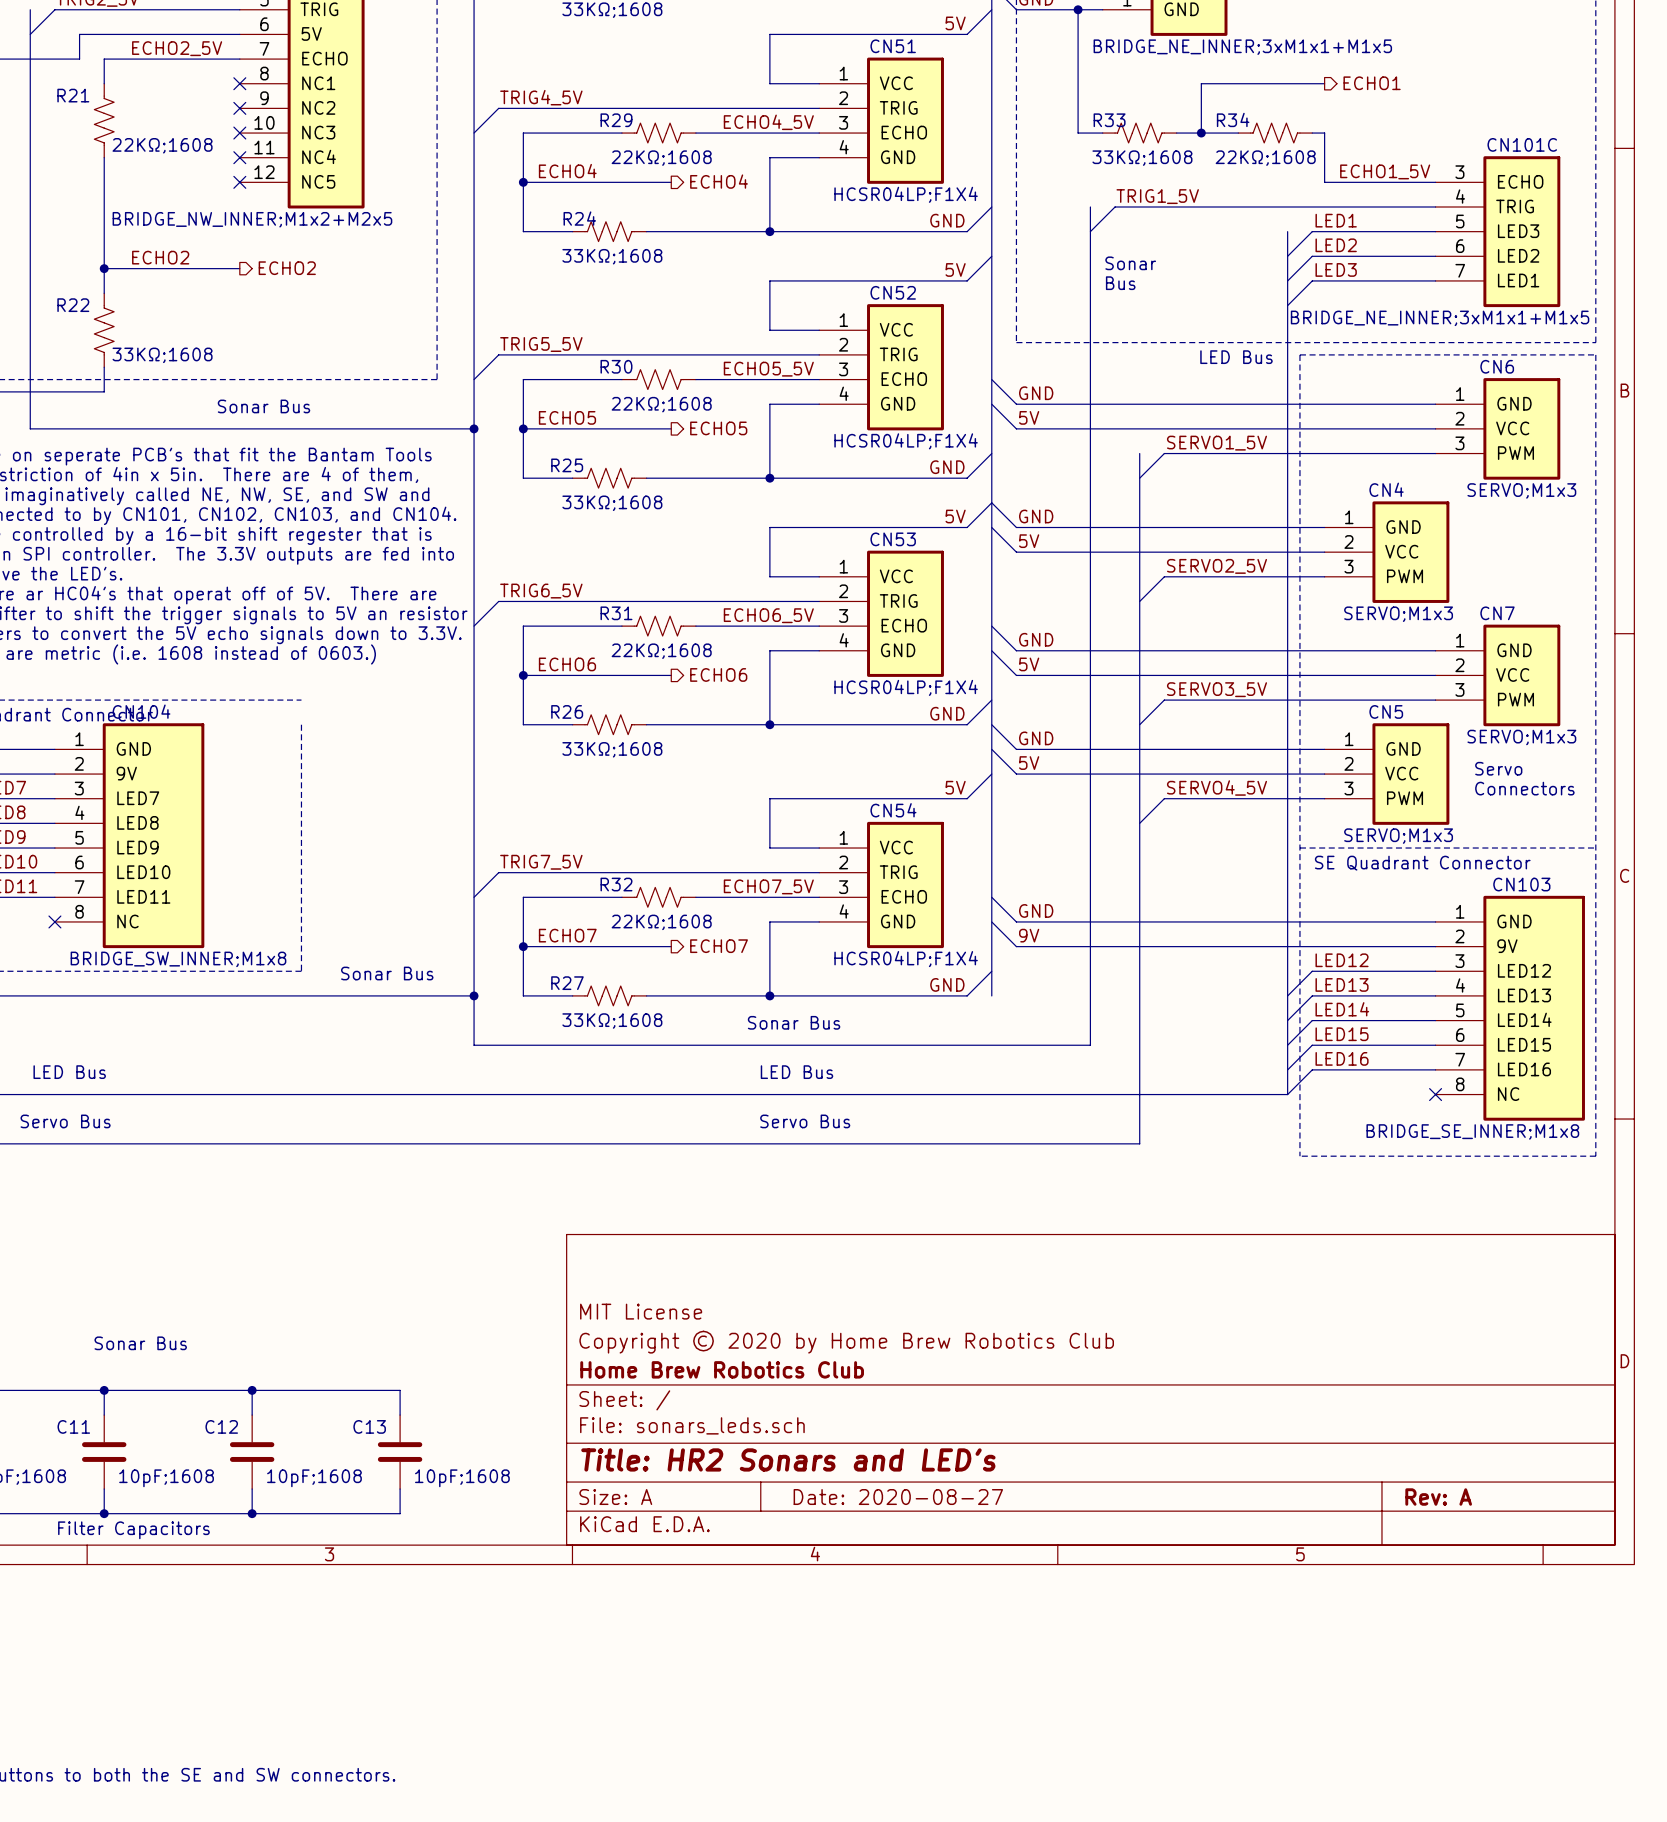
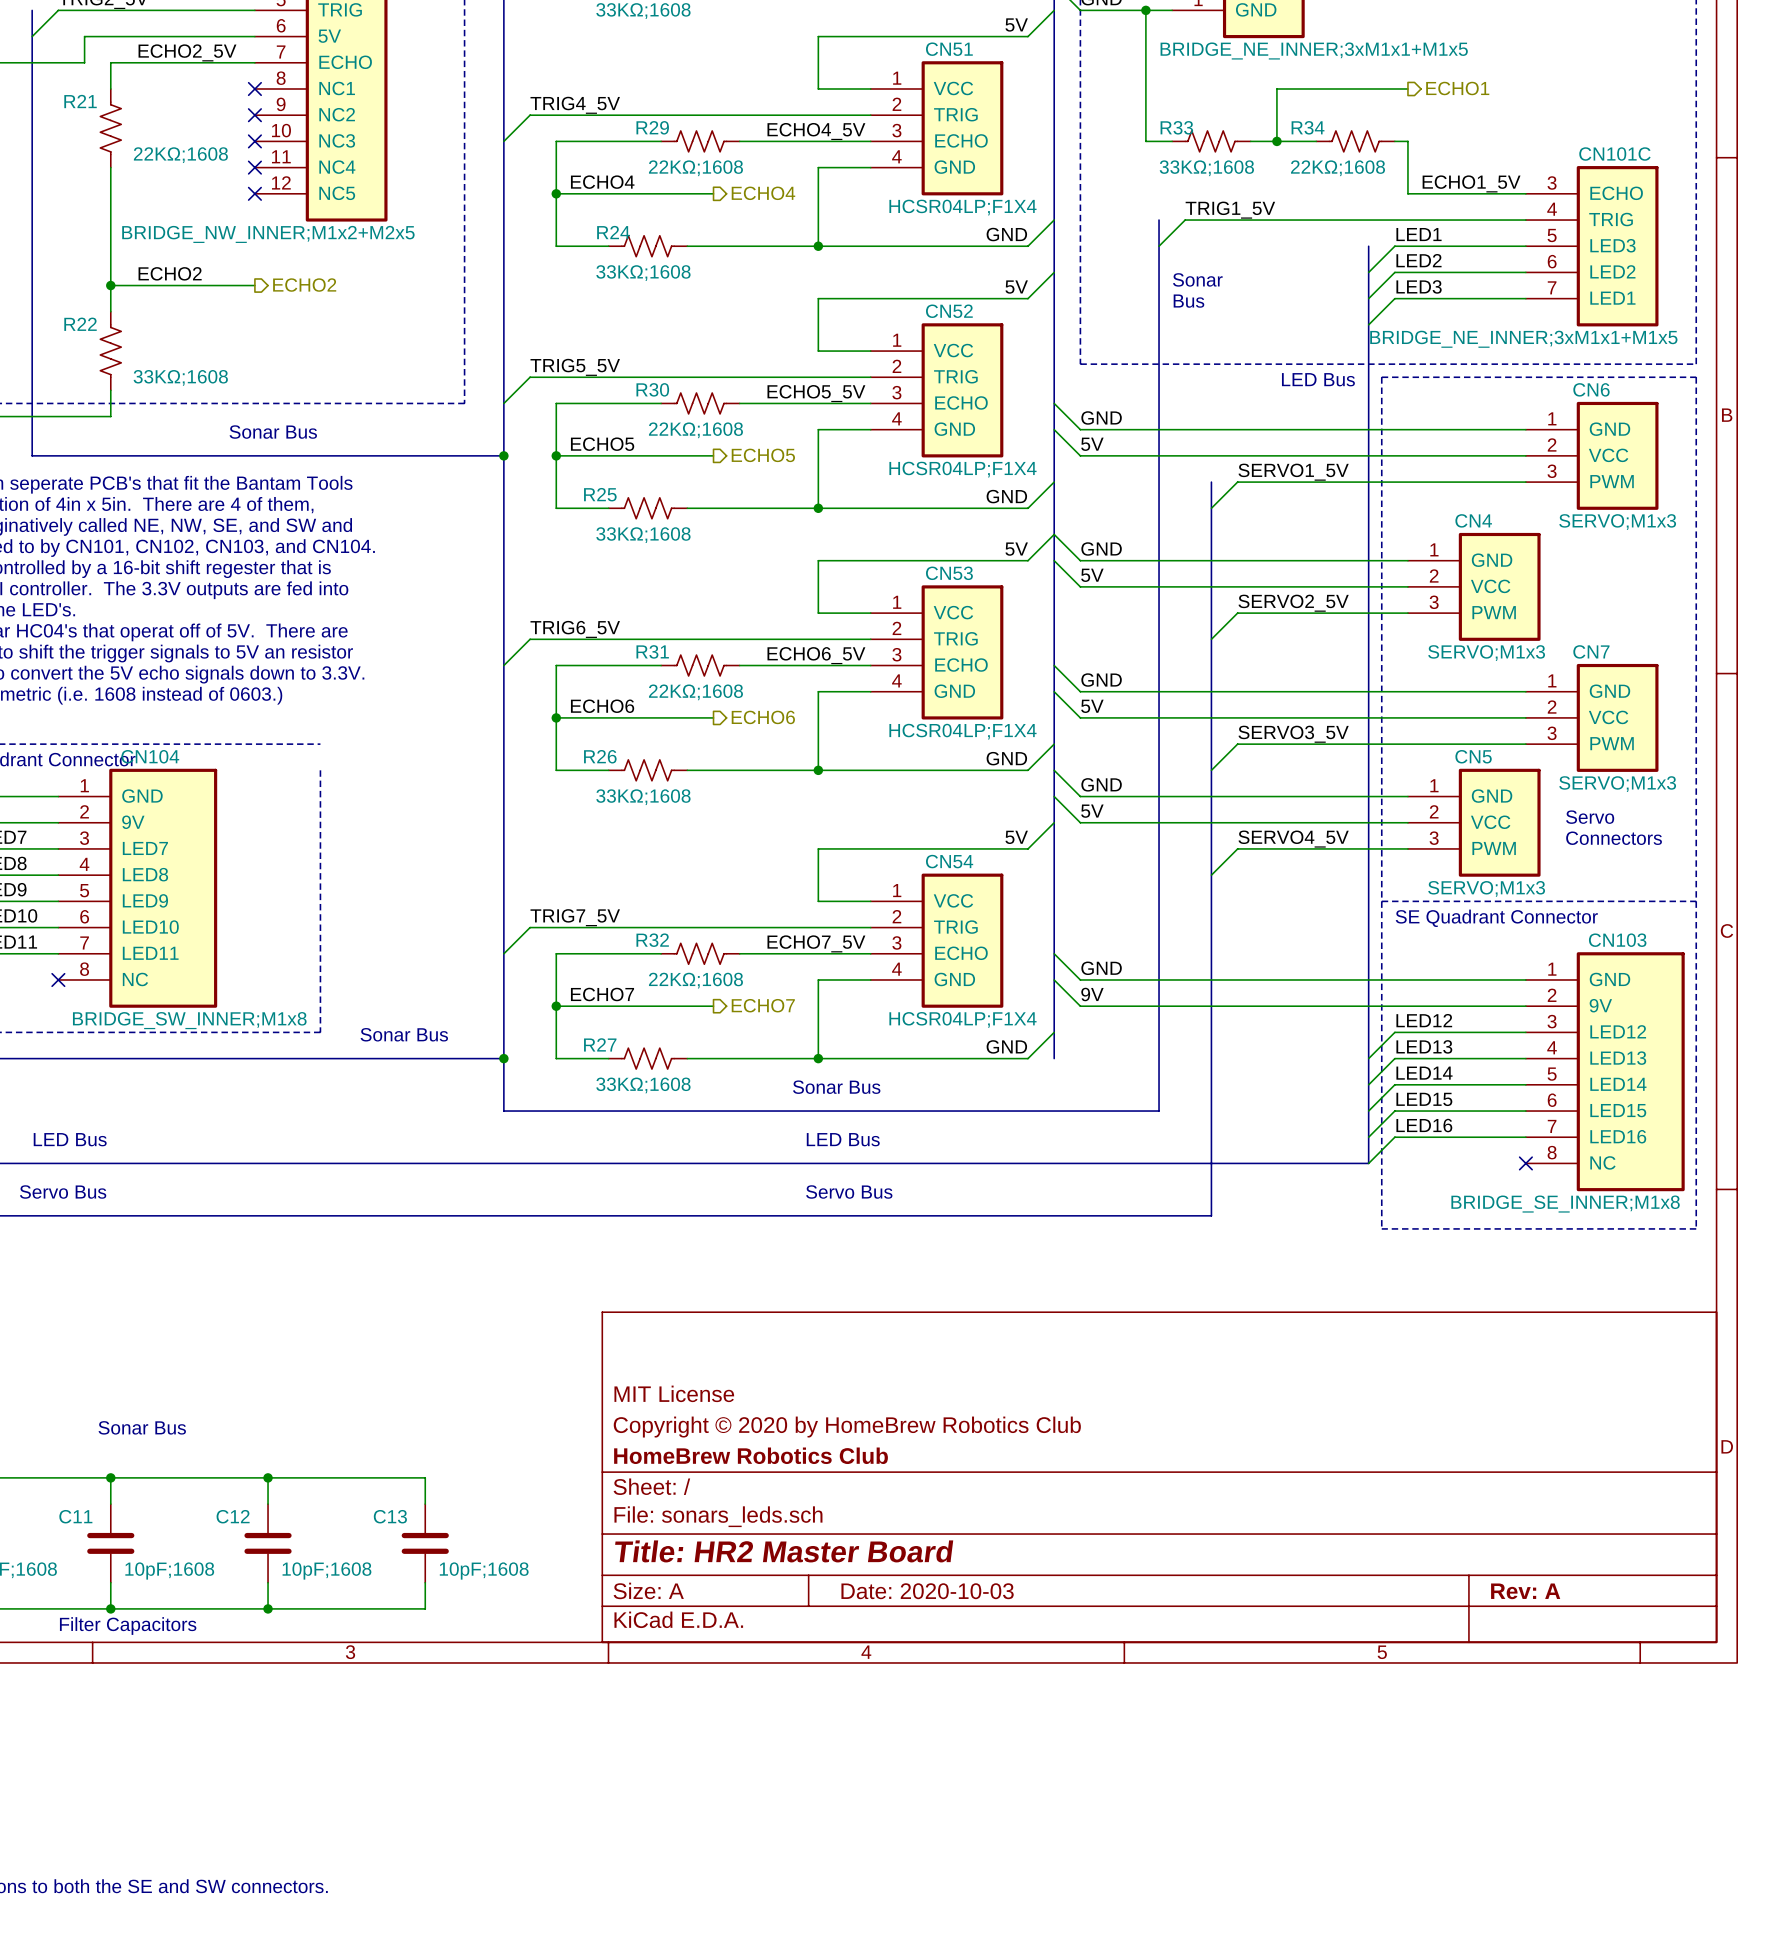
title block: Copyright © 2020 by Home Brew Robotics Club (846, 1342) -> Copyright © 2020 by HomeBrew Robotics Club (847, 1427)
title block: Home Brew Robotics Club (722, 1369) -> HomeBrew Robotics Club (751, 1455)
title block: Title: HR2 Sonars and LED's (788, 1459) -> Title: HR2 Master Board (784, 1551)
title block: Date: 2020-08-27 (898, 1497) -> Date: 2020-10-03 (927, 1591)

